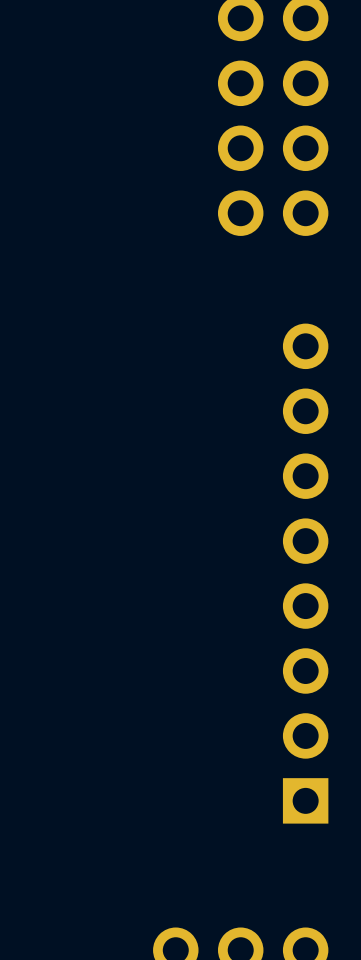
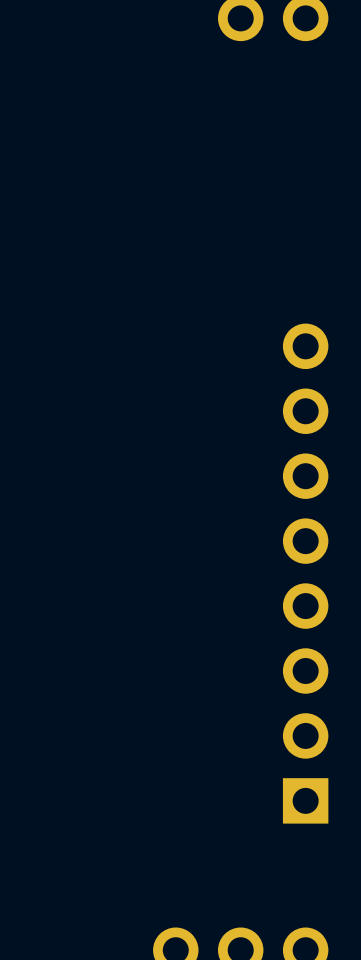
part: (273, 83) -> none
part: (273, 148) -> none
part: (273, 213) -> none

